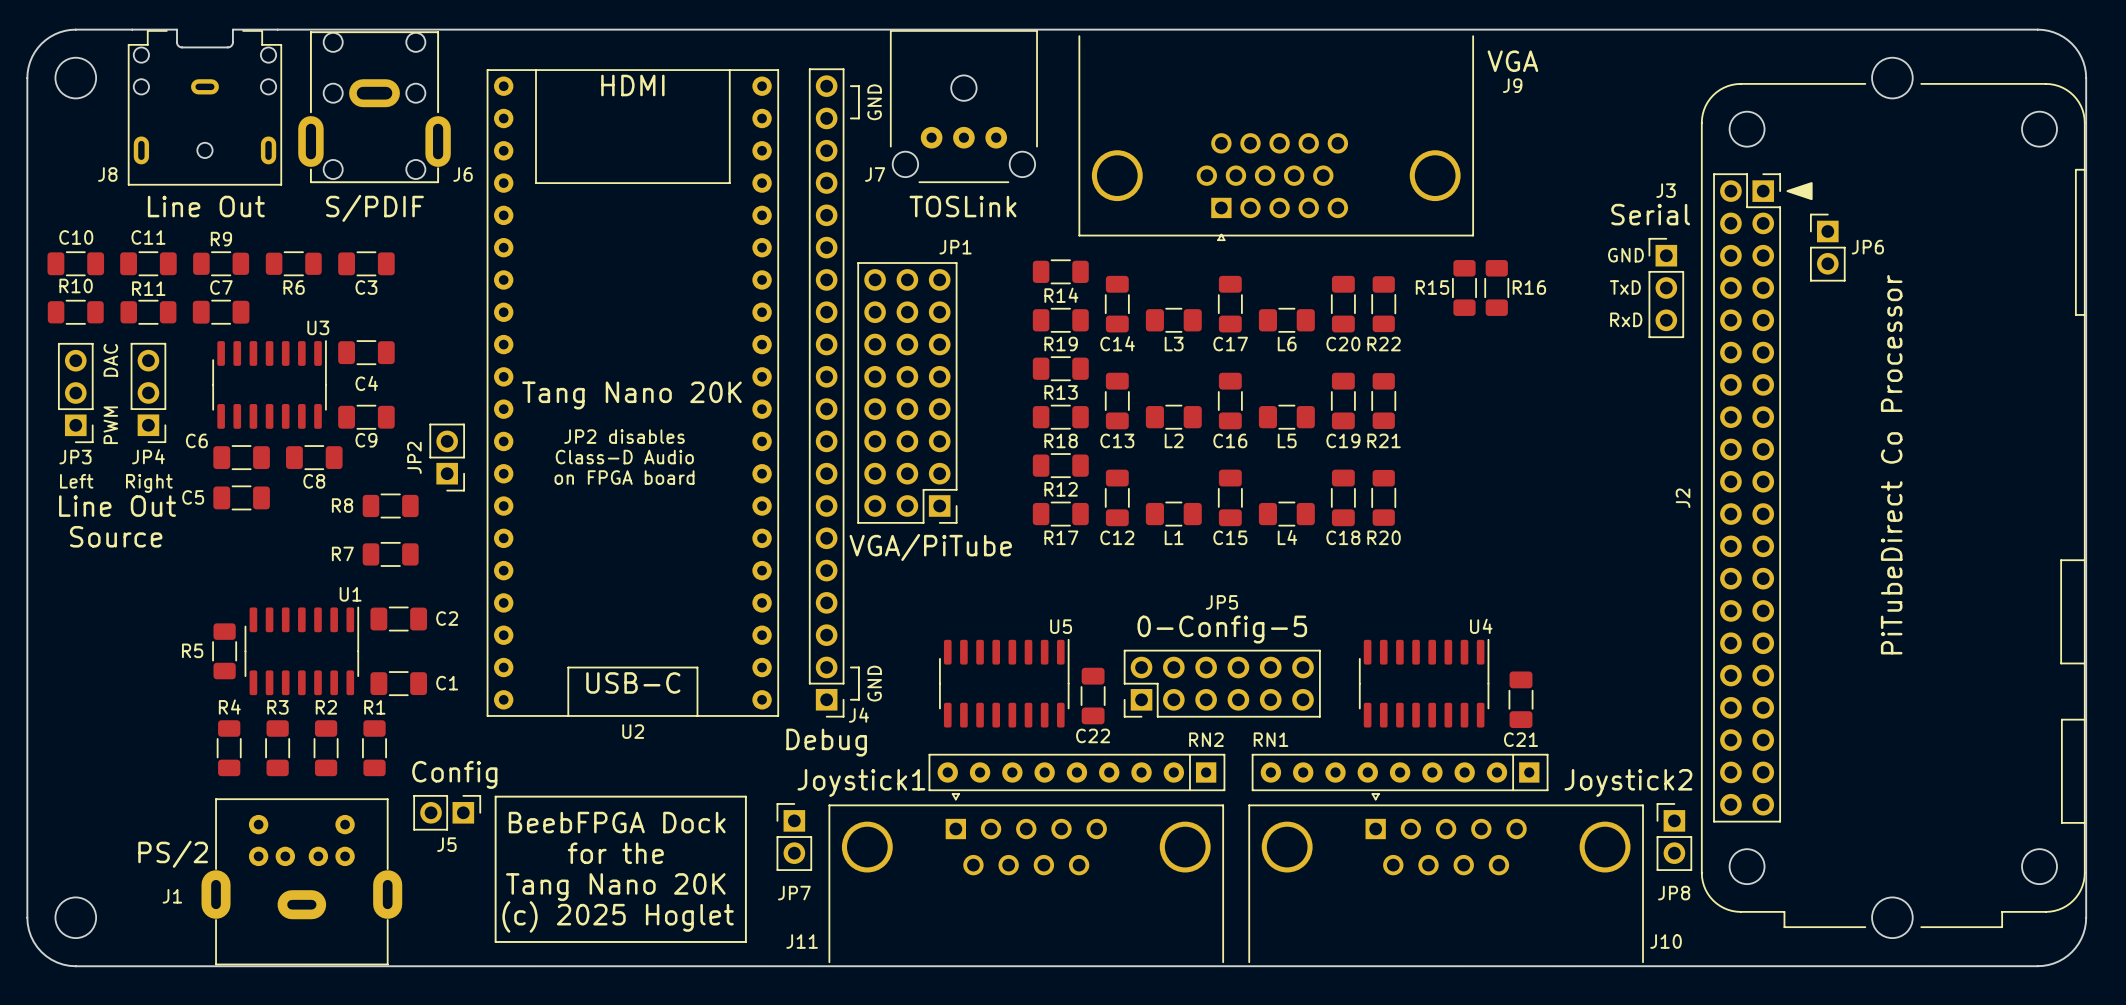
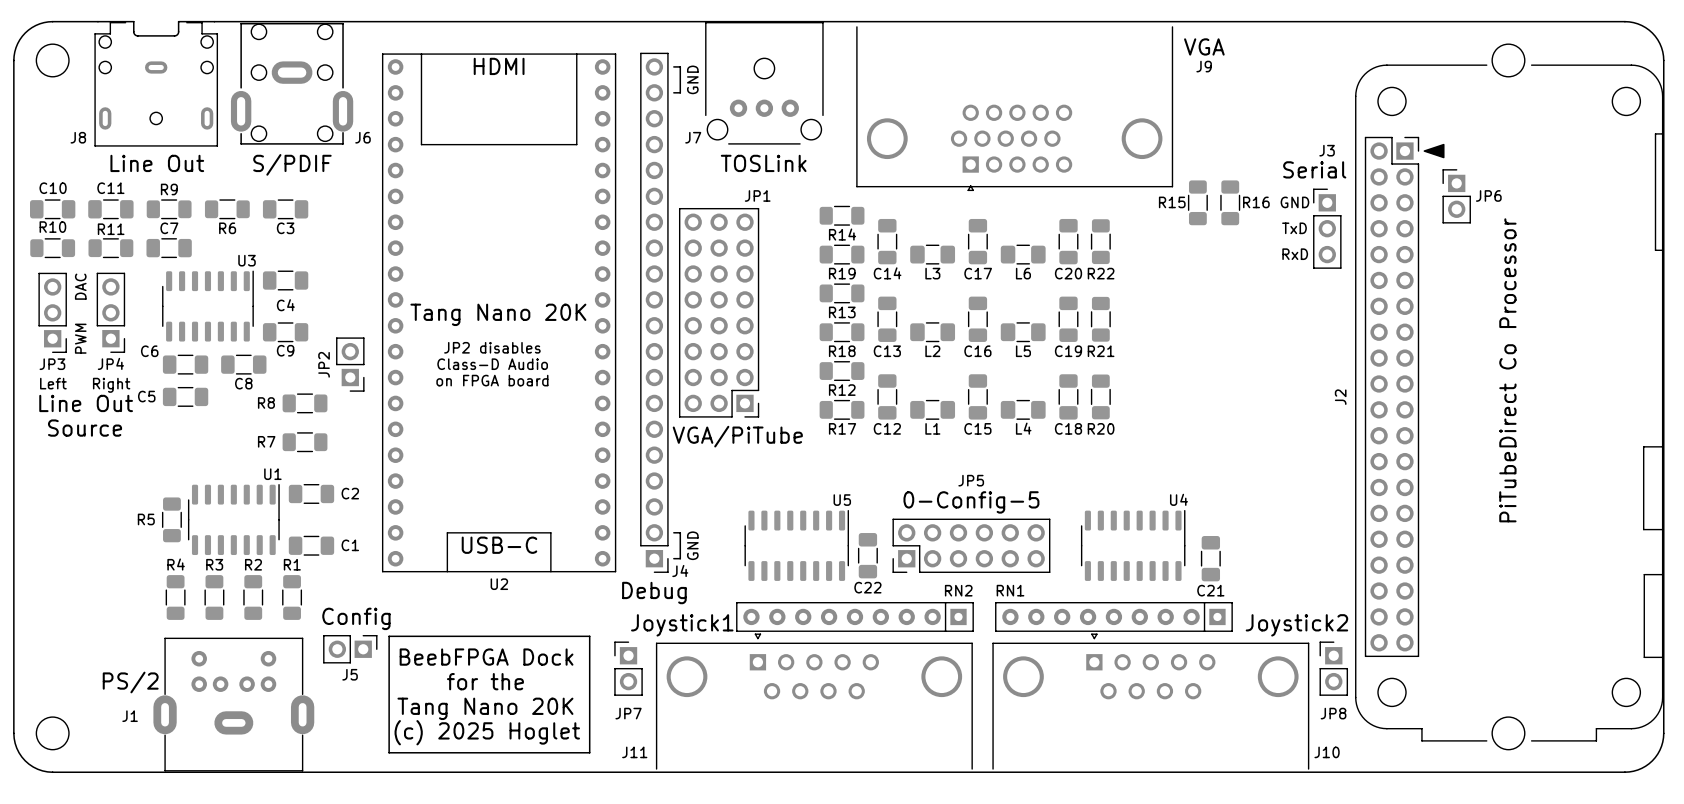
R15 position: (1464, 287) -> (1197, 202)
R16 position: (1496, 287) -> (1230, 202)

